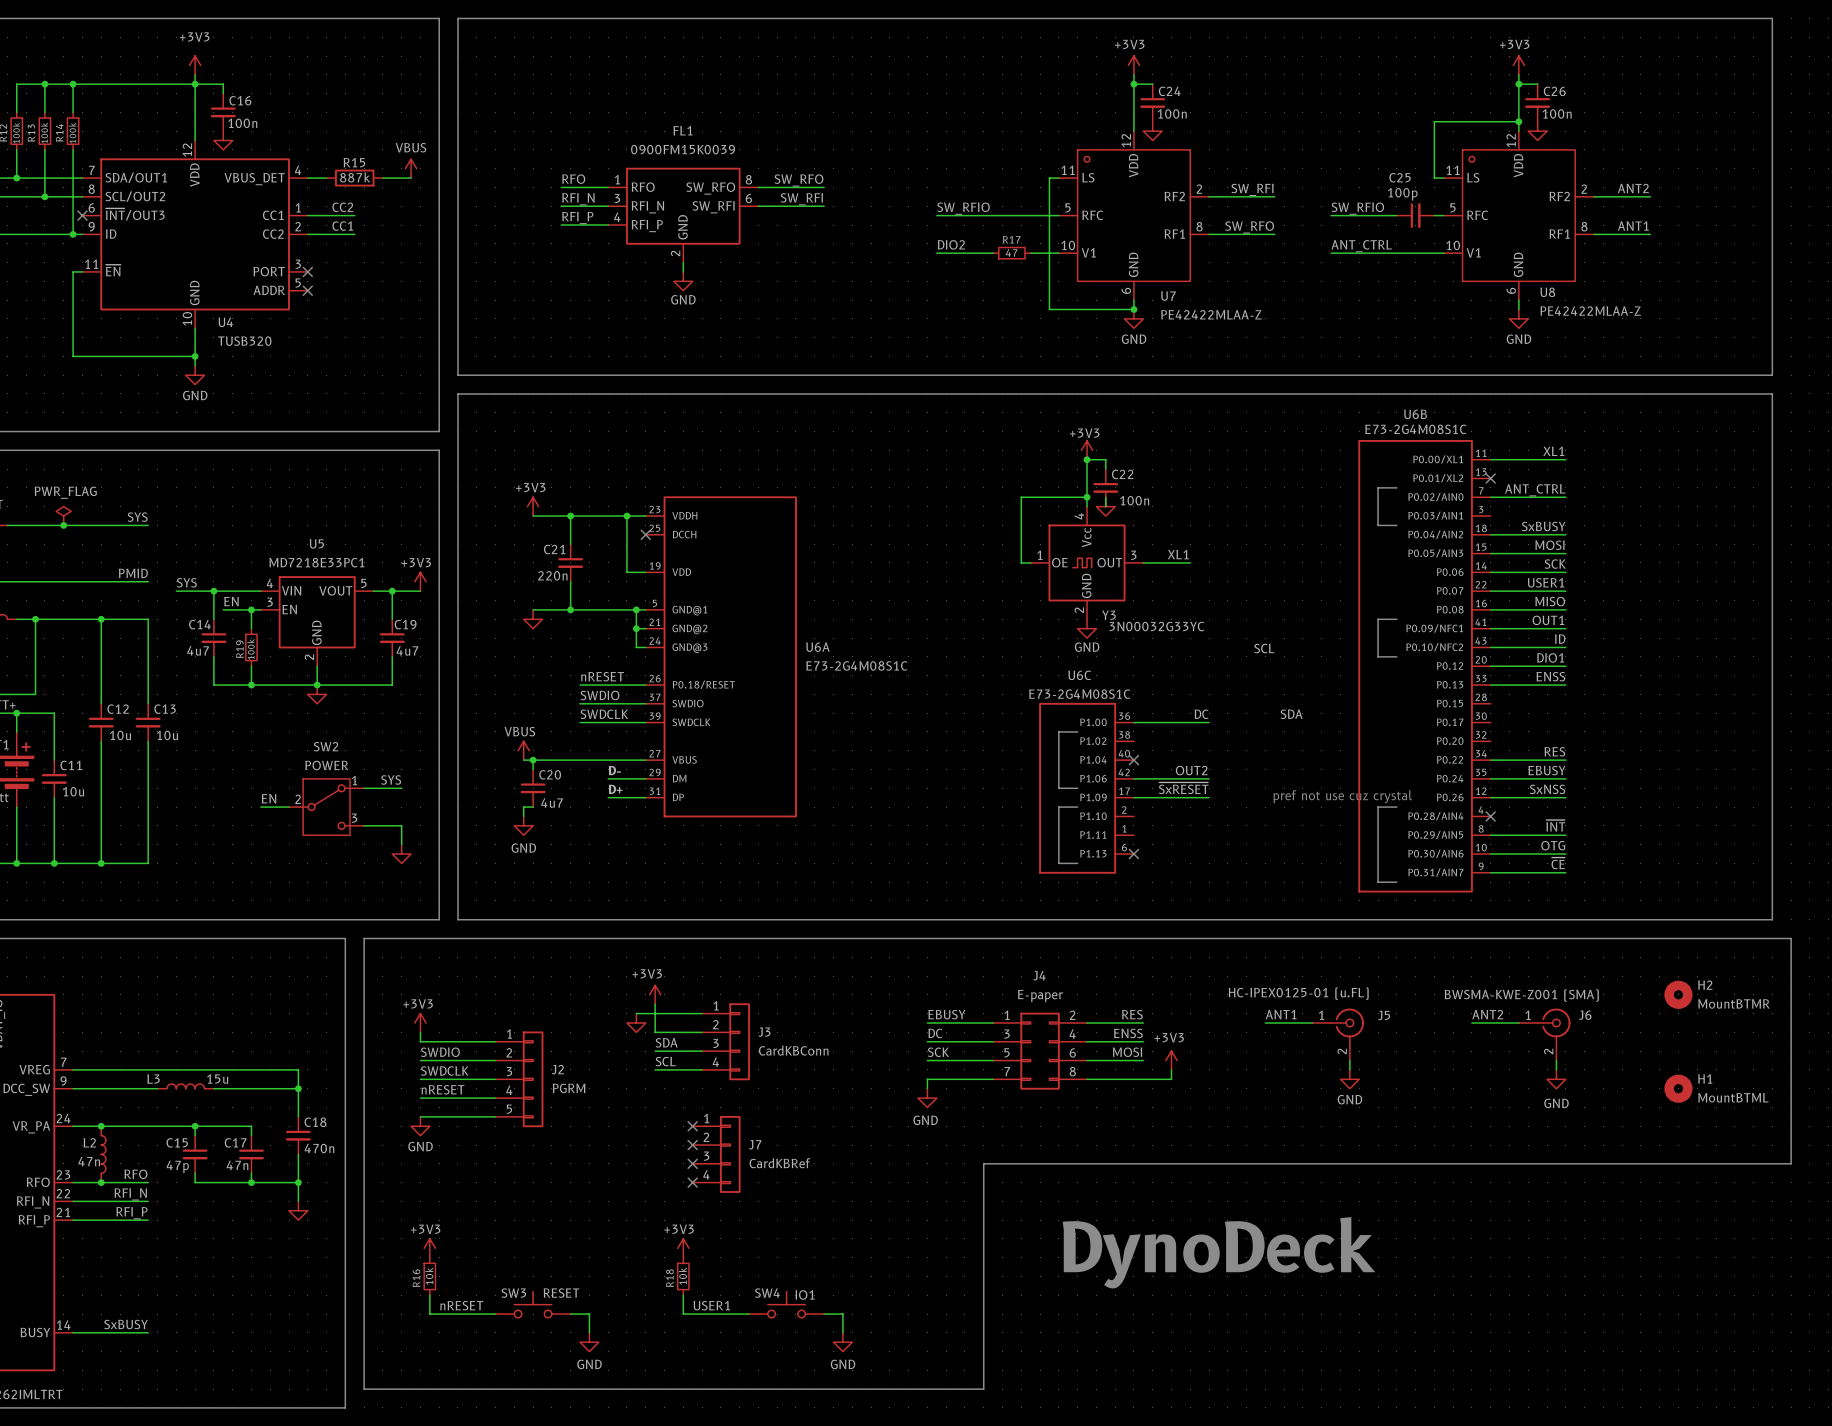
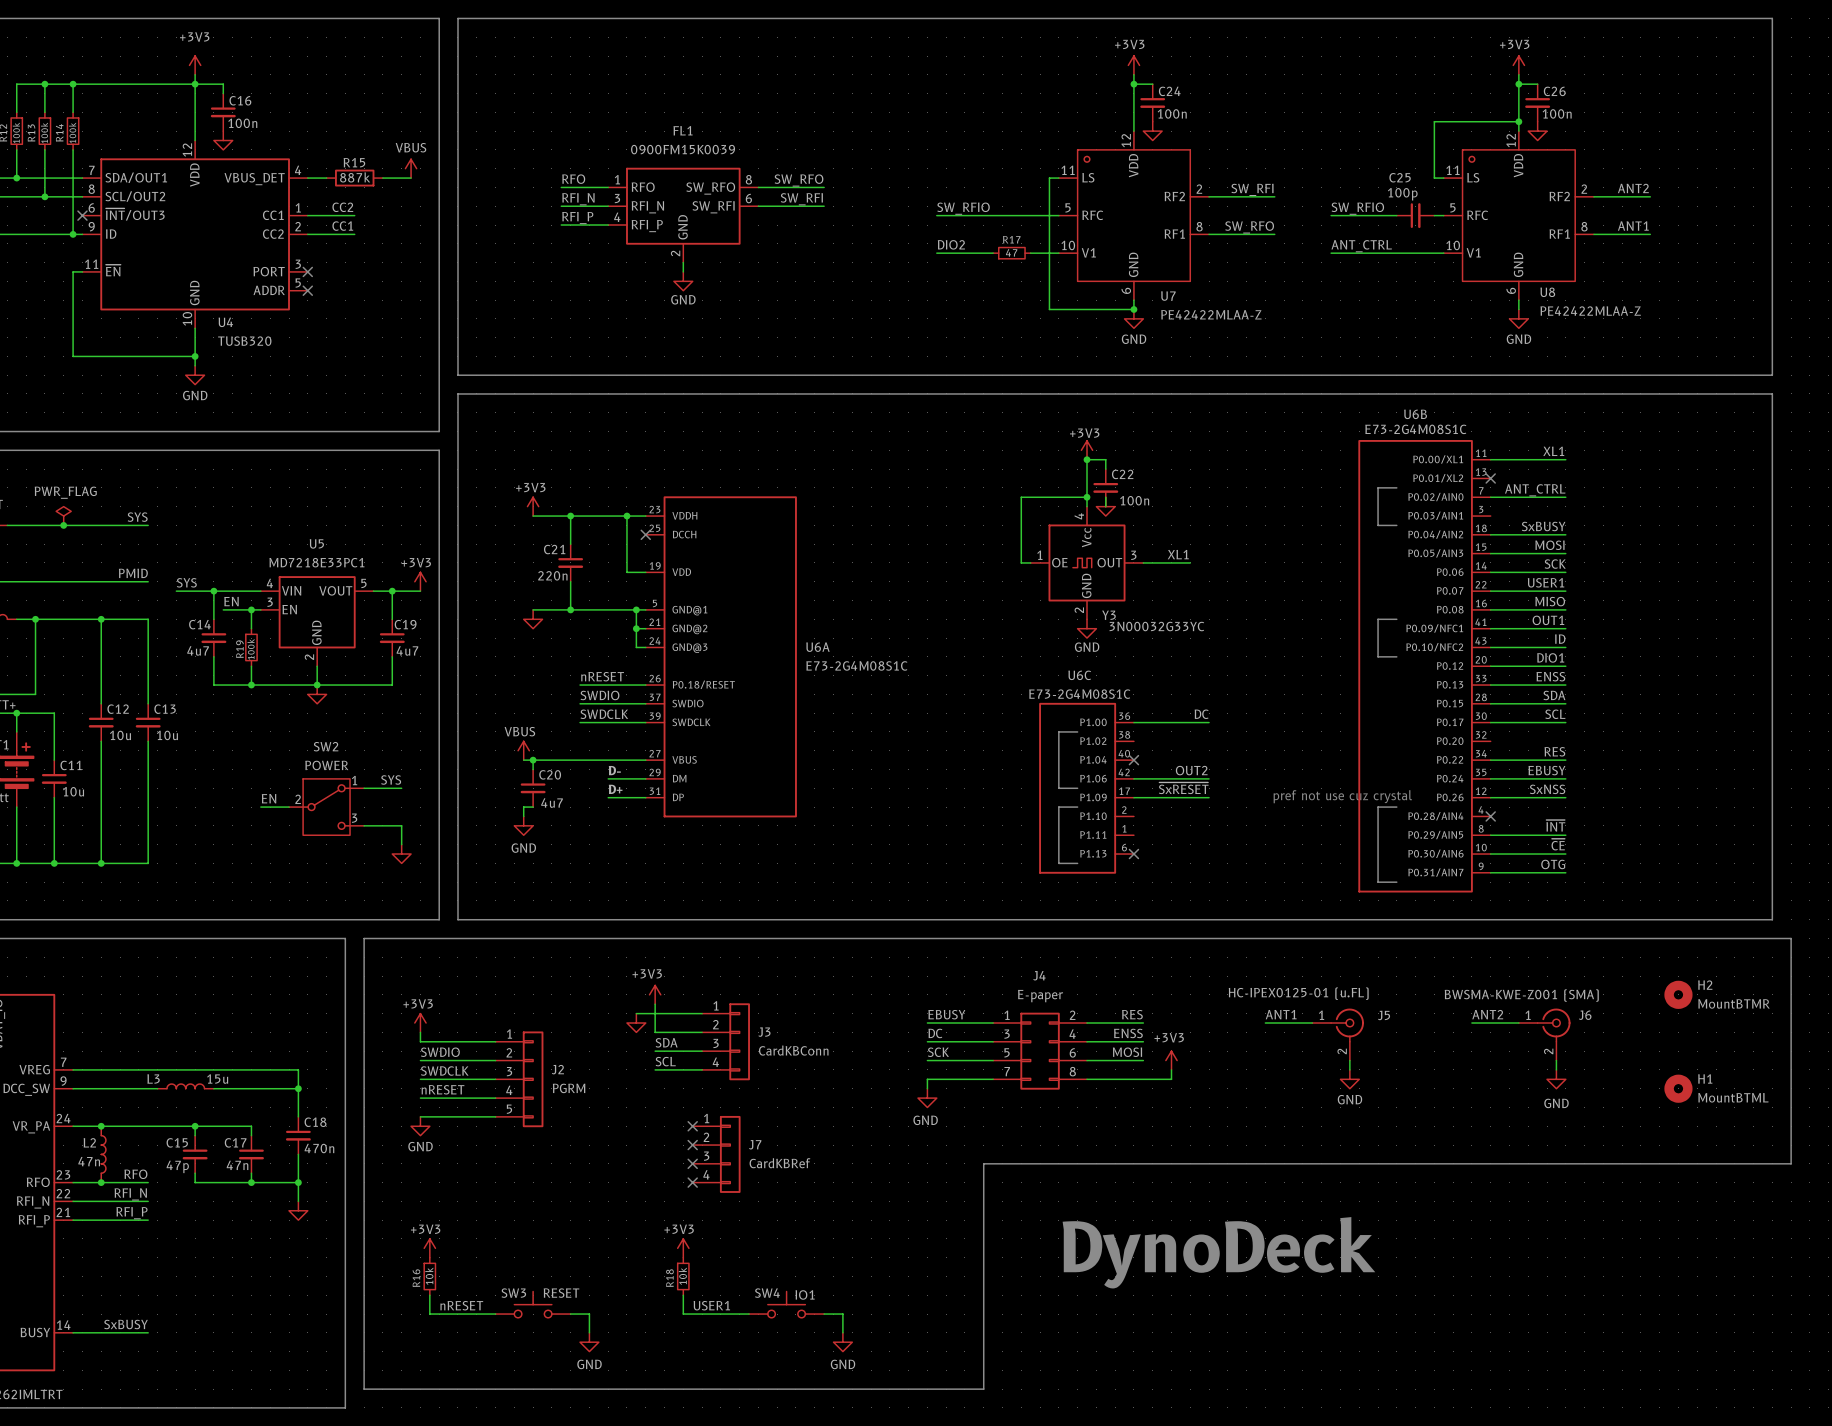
label: SCL (1264, 648) -> none
label: none -> SDA (1554, 695)
wire: none -> (1490, 703) (1565, 703)
label: SDA (1291, 714) -> none
label: none -> SCL (1555, 714)
wire: none -> (1490, 722) (1565, 722)
label: OTG (1553, 845) -> ~{CE} (1558, 844)
label: ~{CE} (1558, 863) -> OTG (1553, 864)

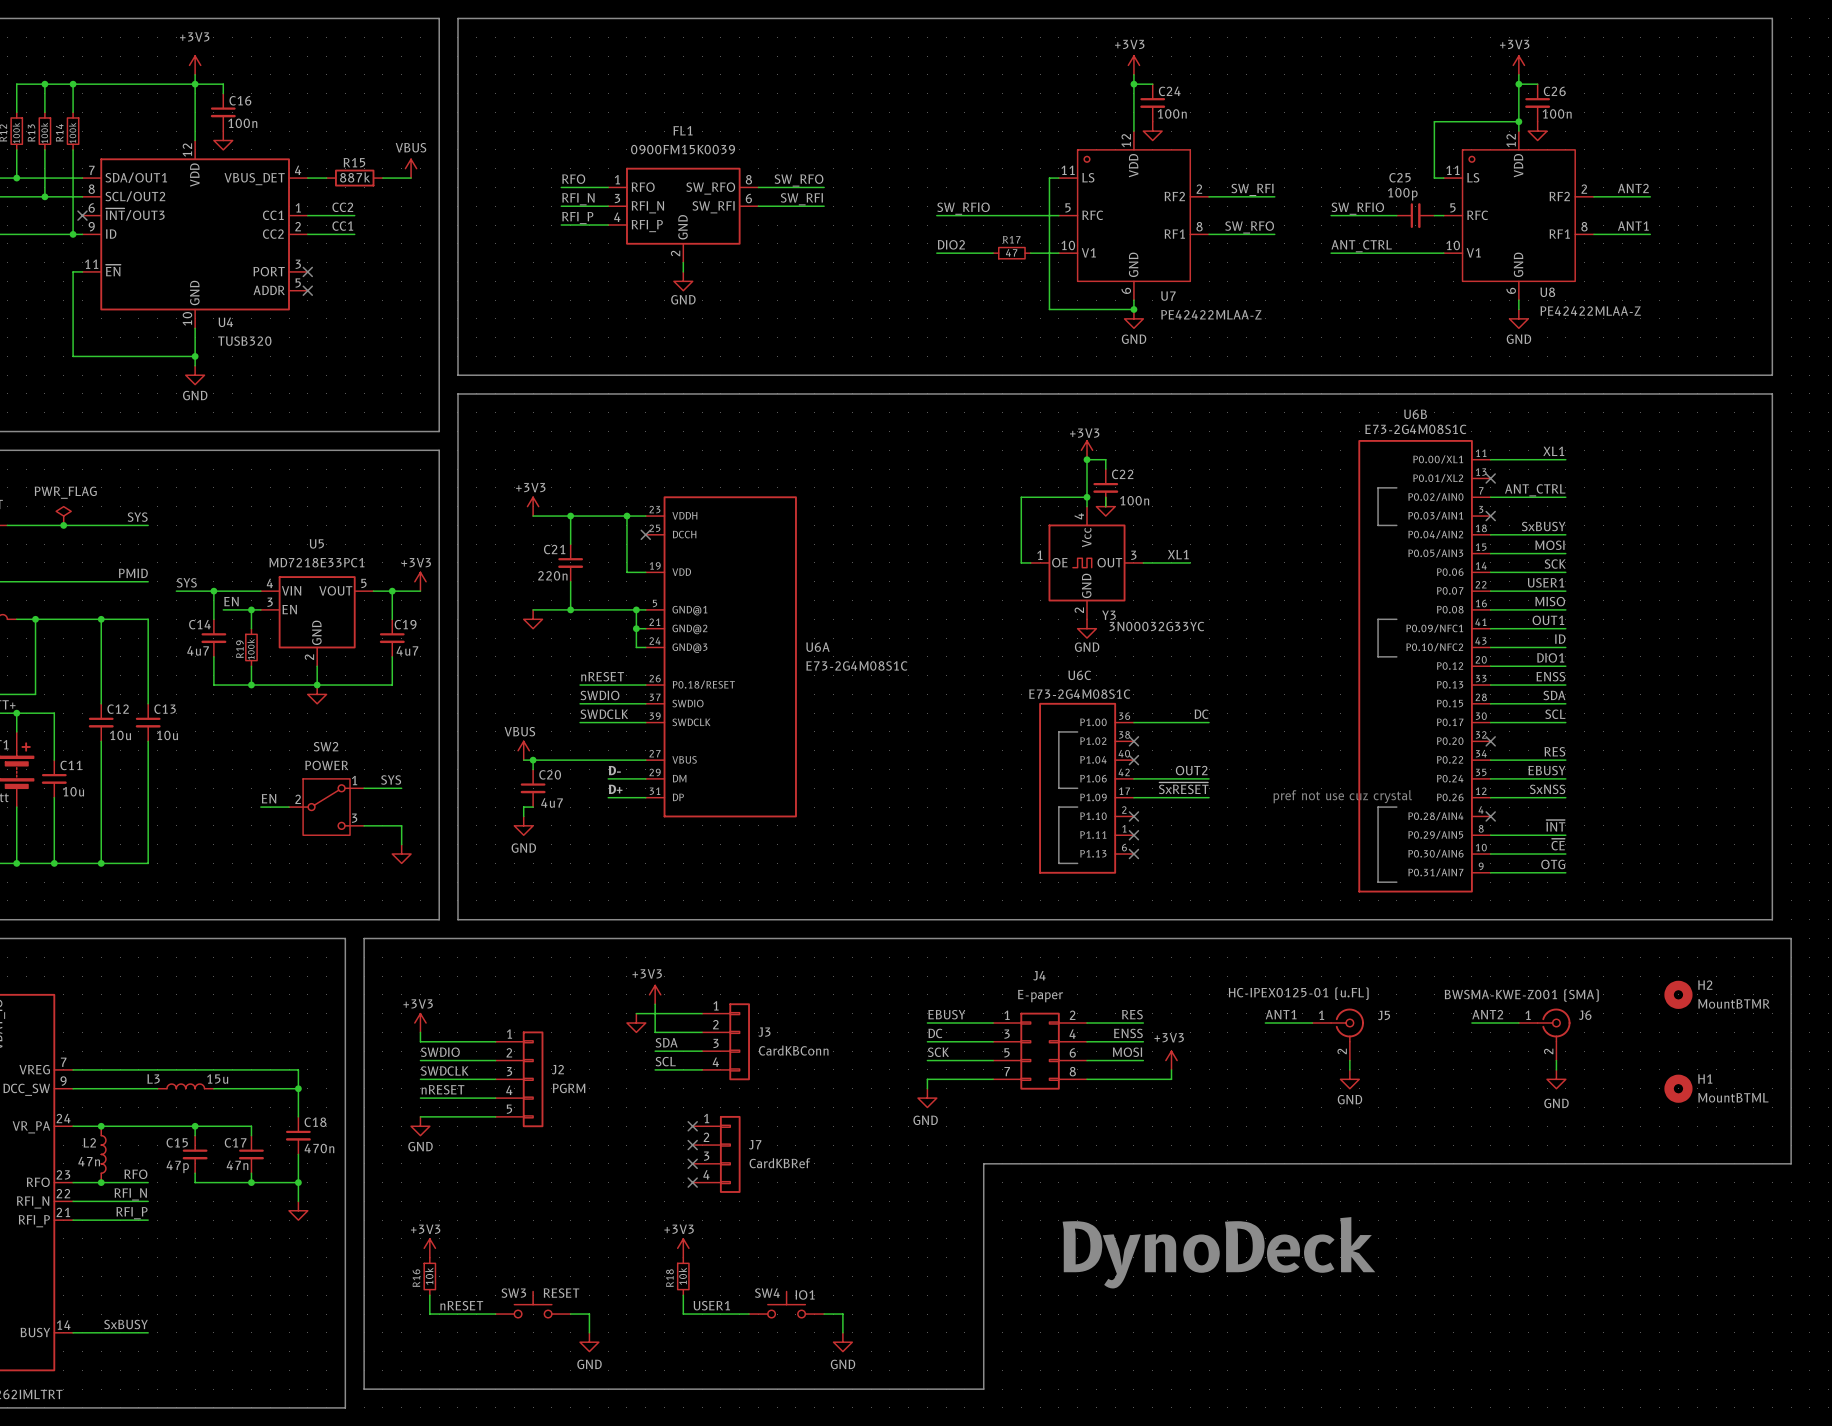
no-connect mark: none -> (1490, 516)
no-connect mark: none -> (1133, 741)
no-connect mark: none -> (1490, 741)
no-connect mark: none -> (1133, 816)
no-connect mark: none -> (1133, 835)

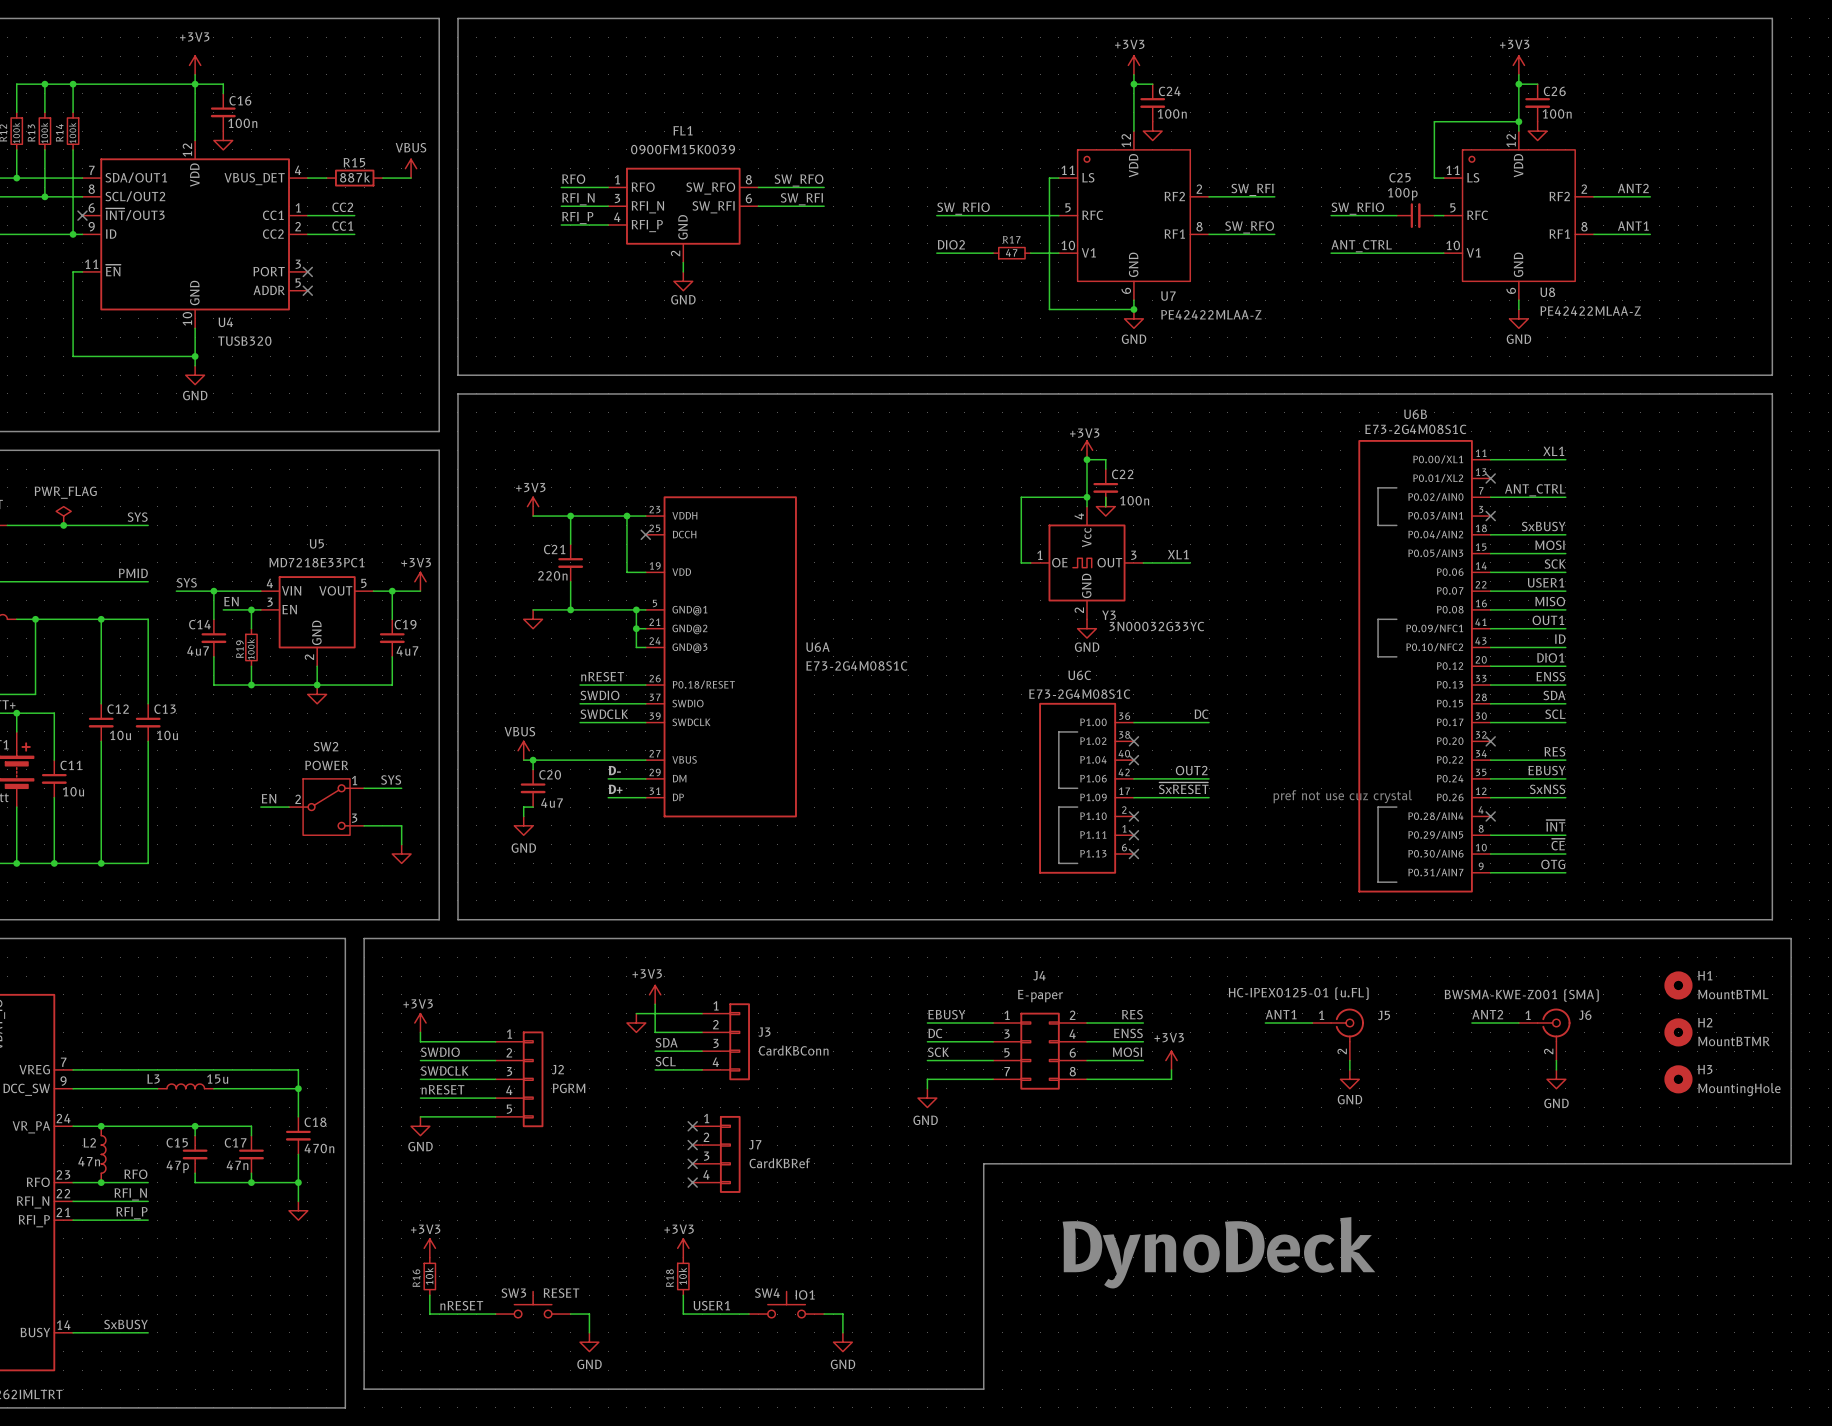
H2 position: (1678, 994) -> (1678, 1032)
H3: none -> MountingHole (1678, 1079)
H1 position: (1678, 1088) -> (1678, 985)

